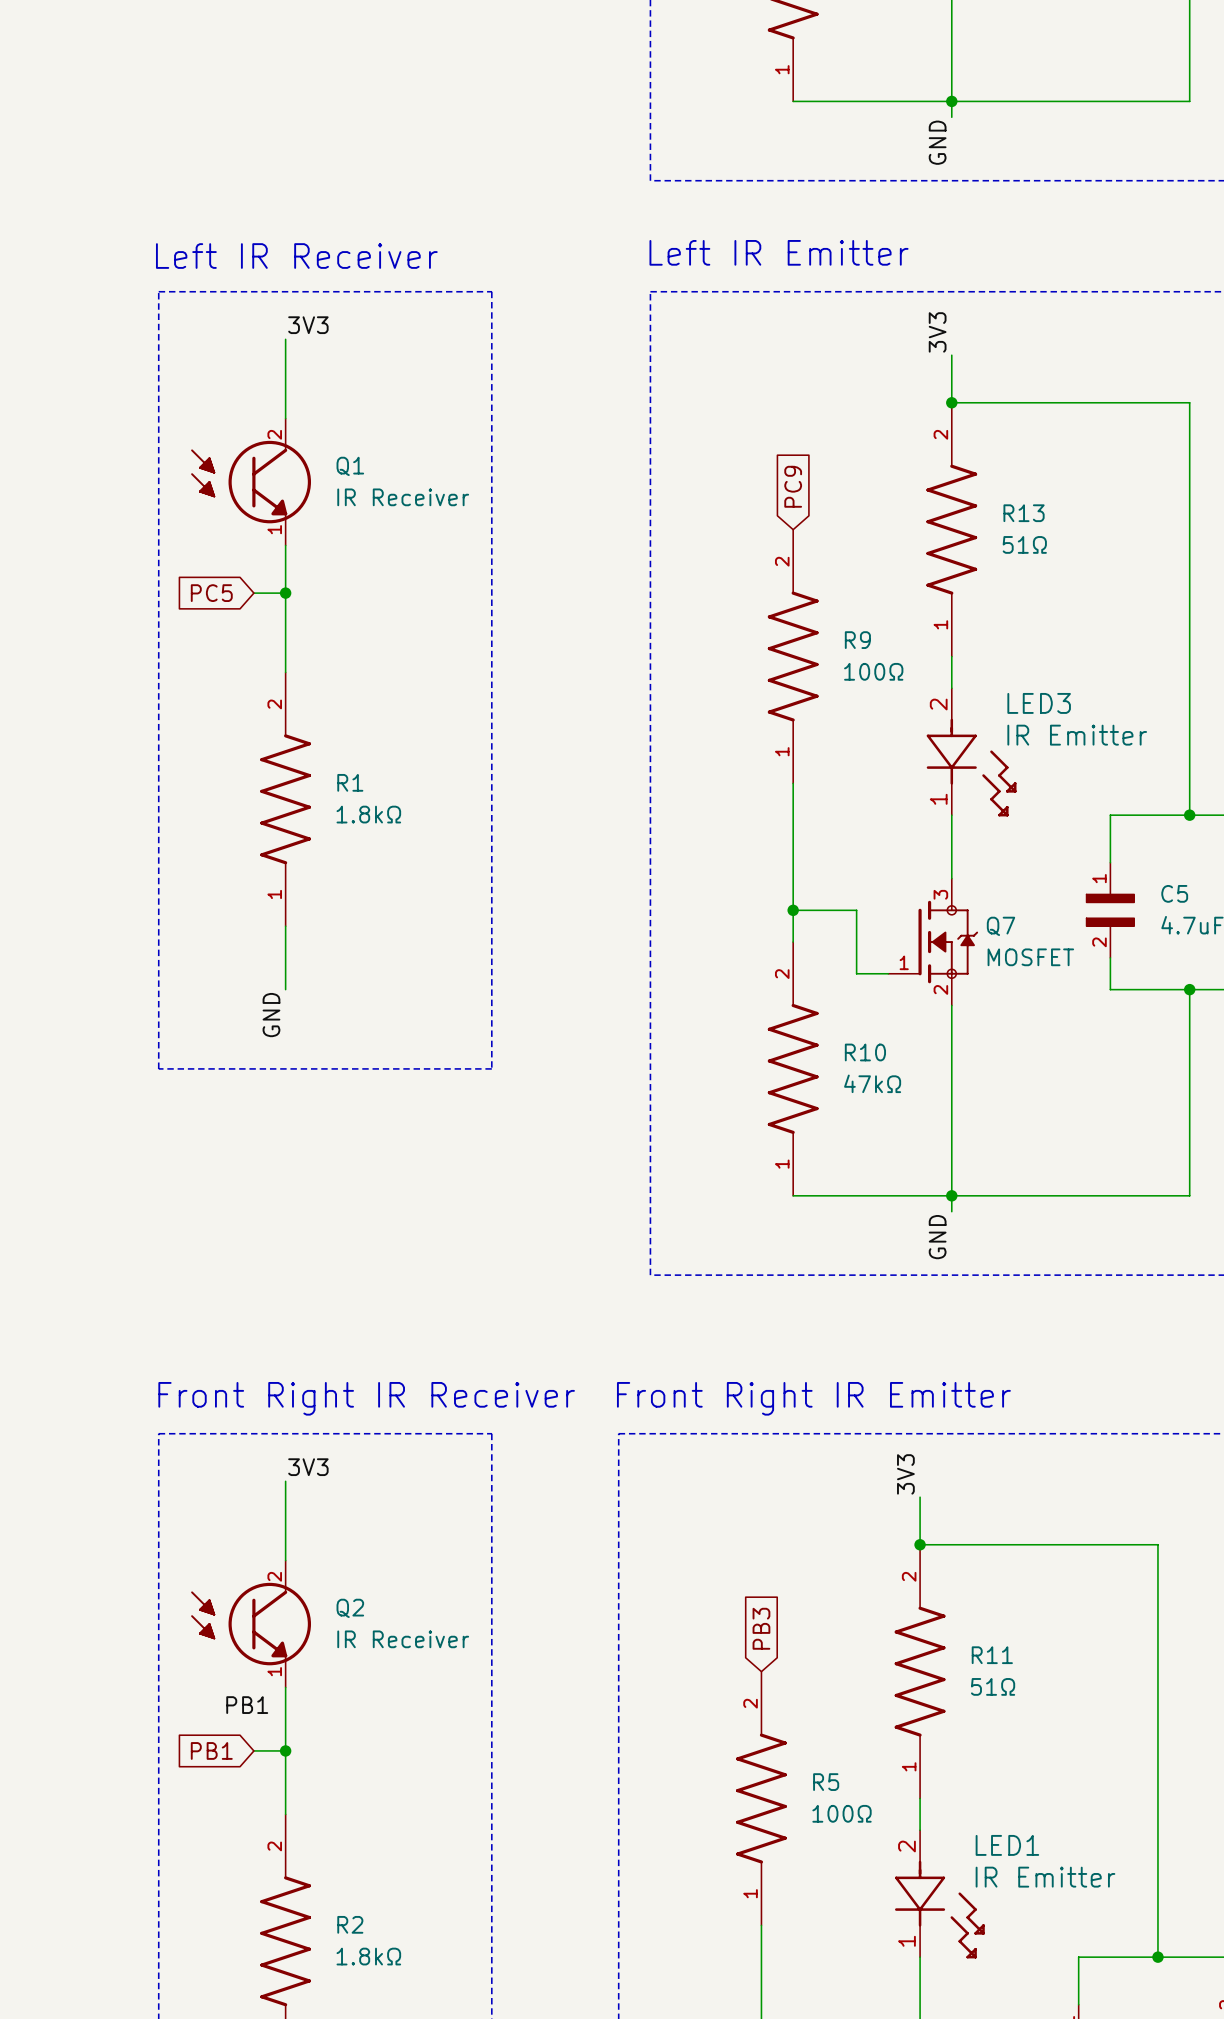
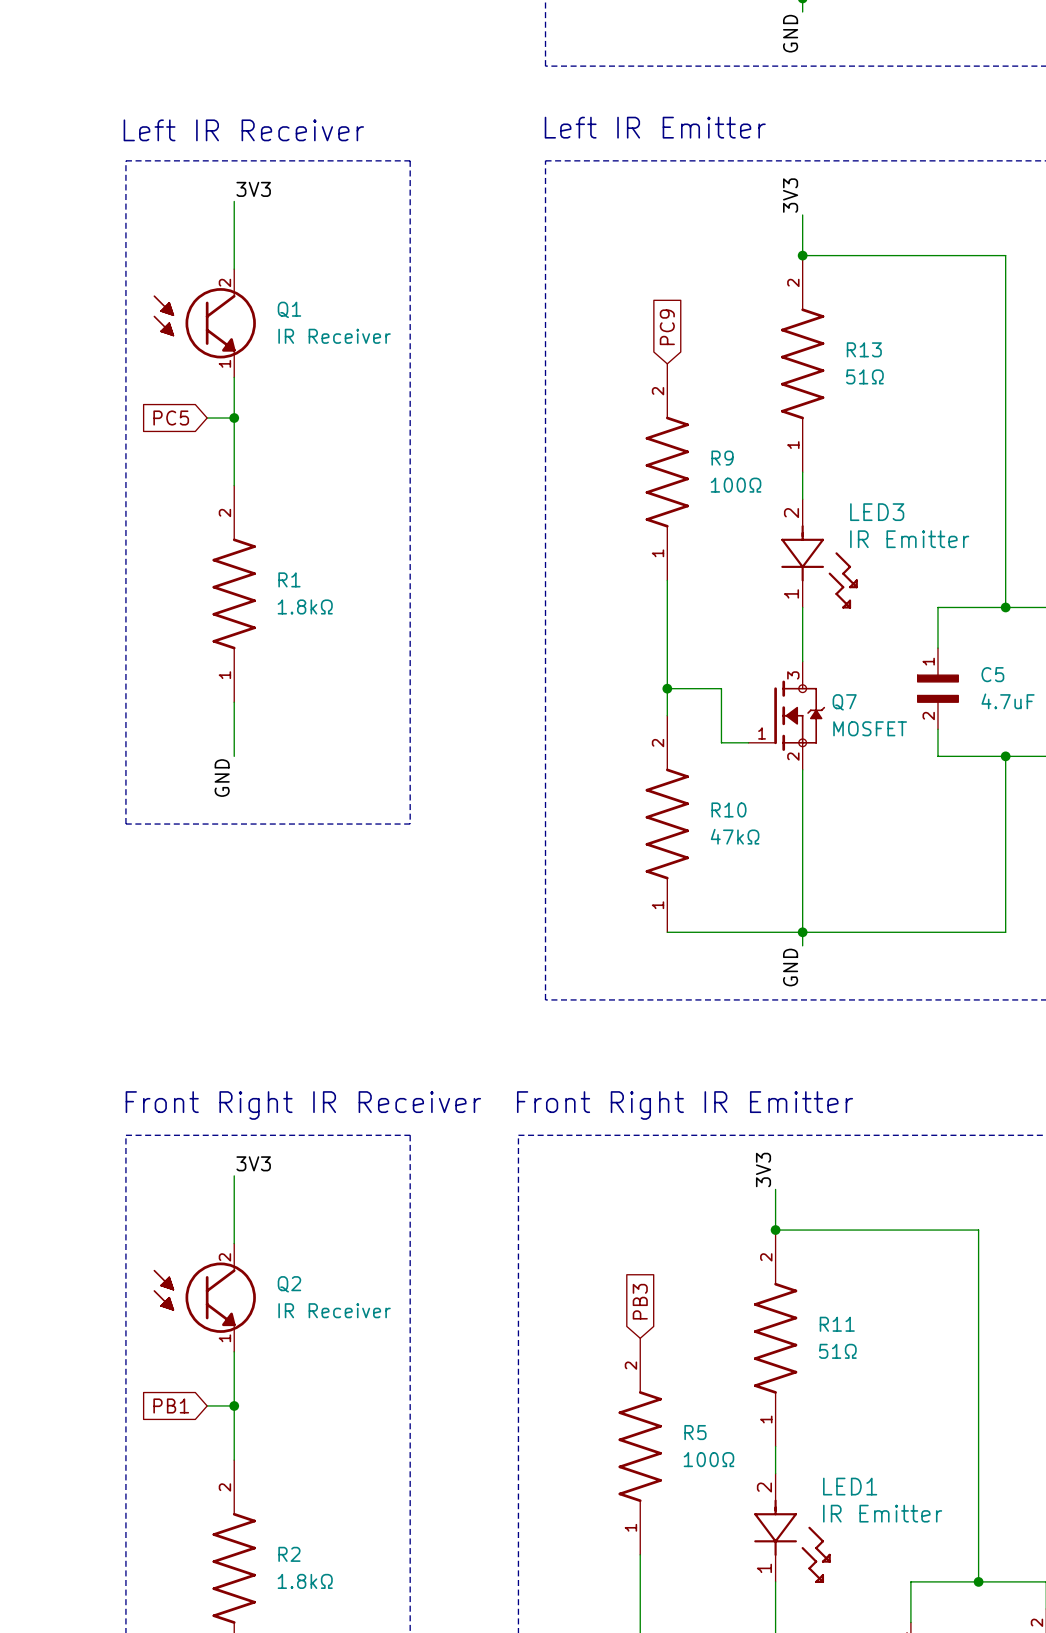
label: PB1 (247, 1705) -> none

